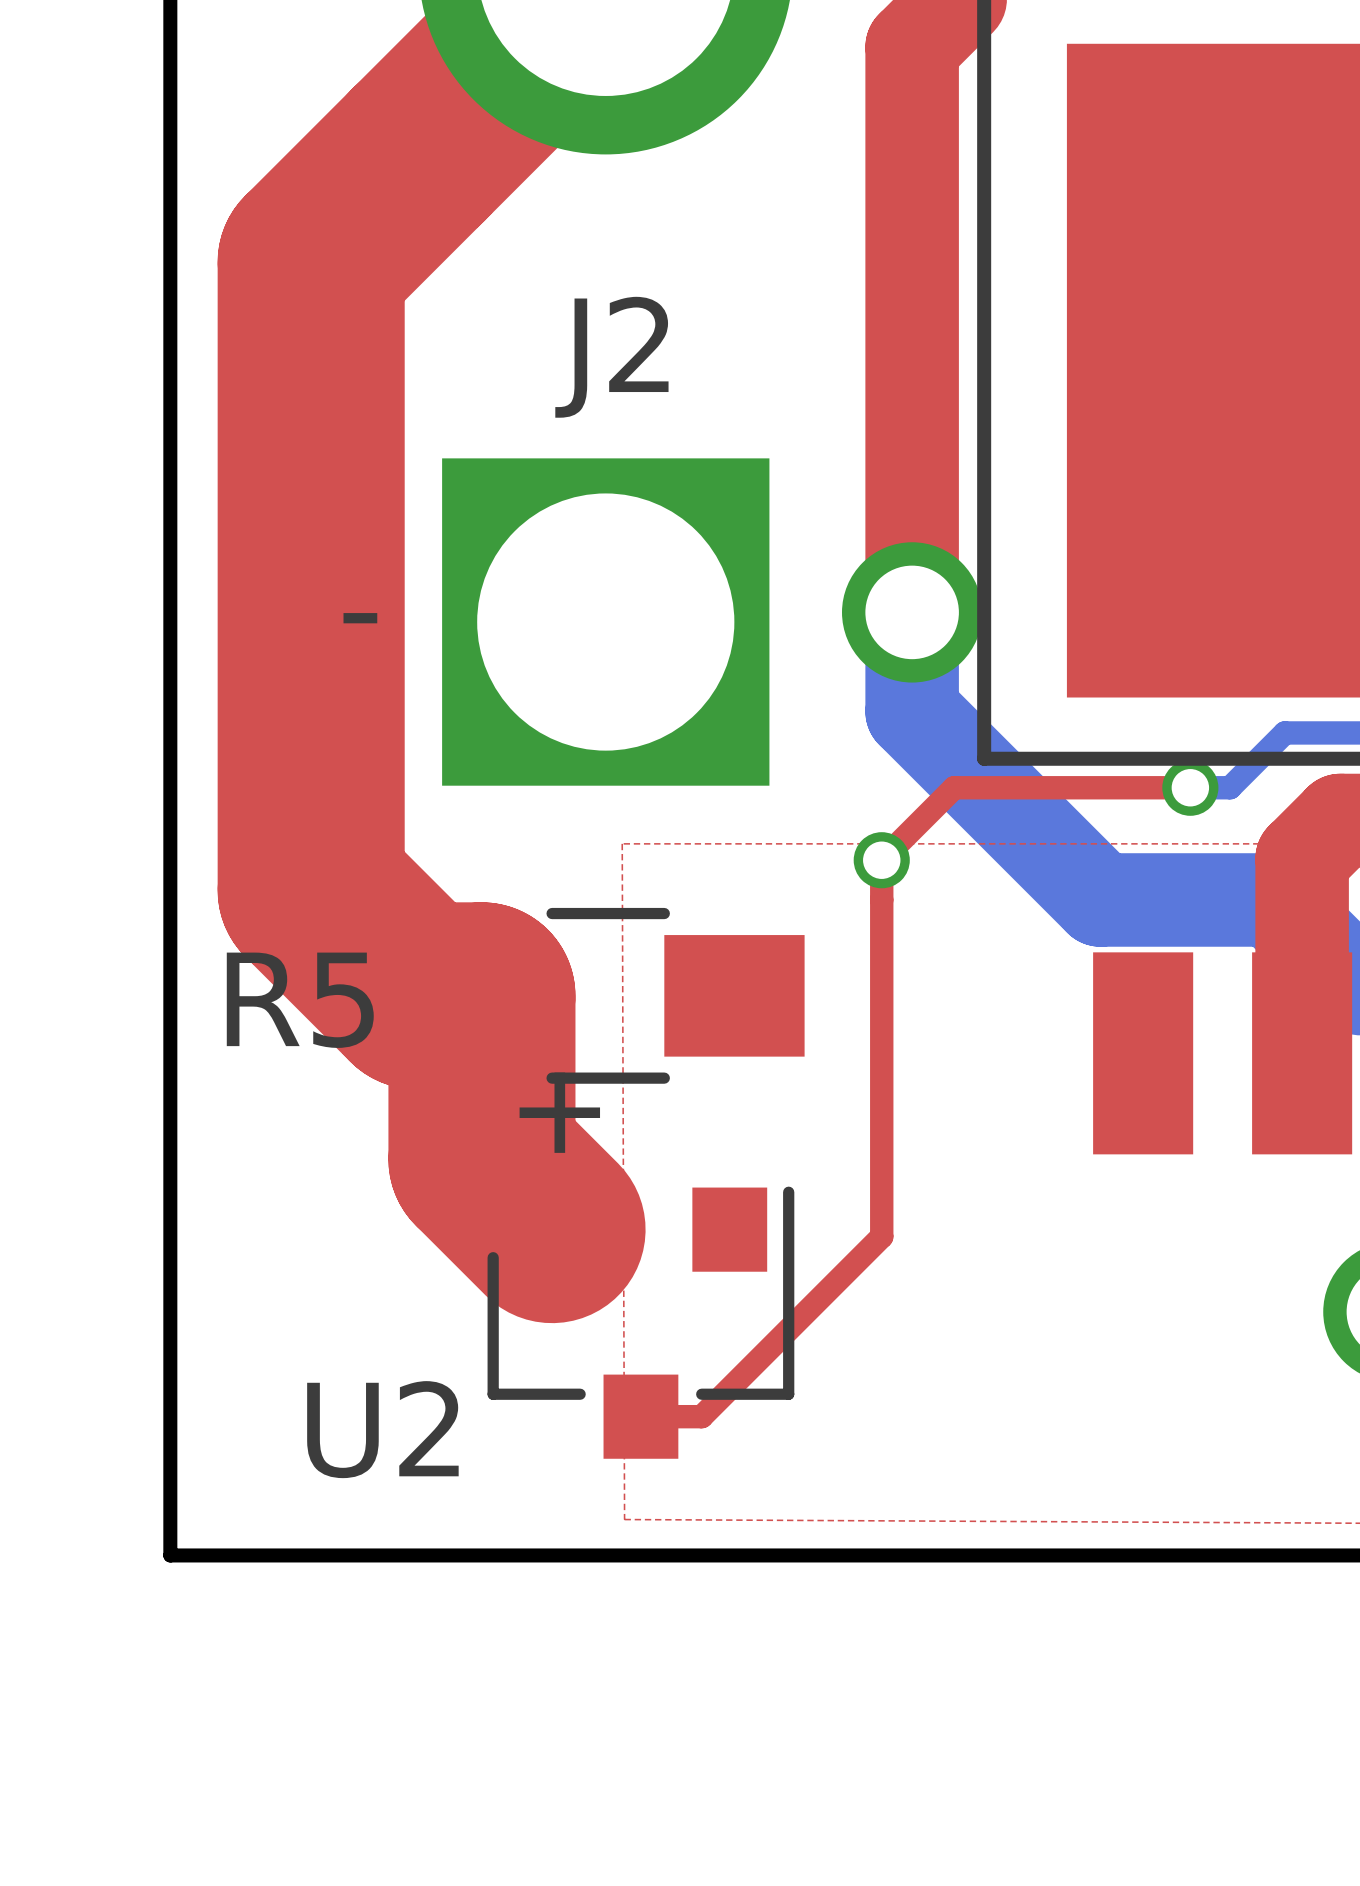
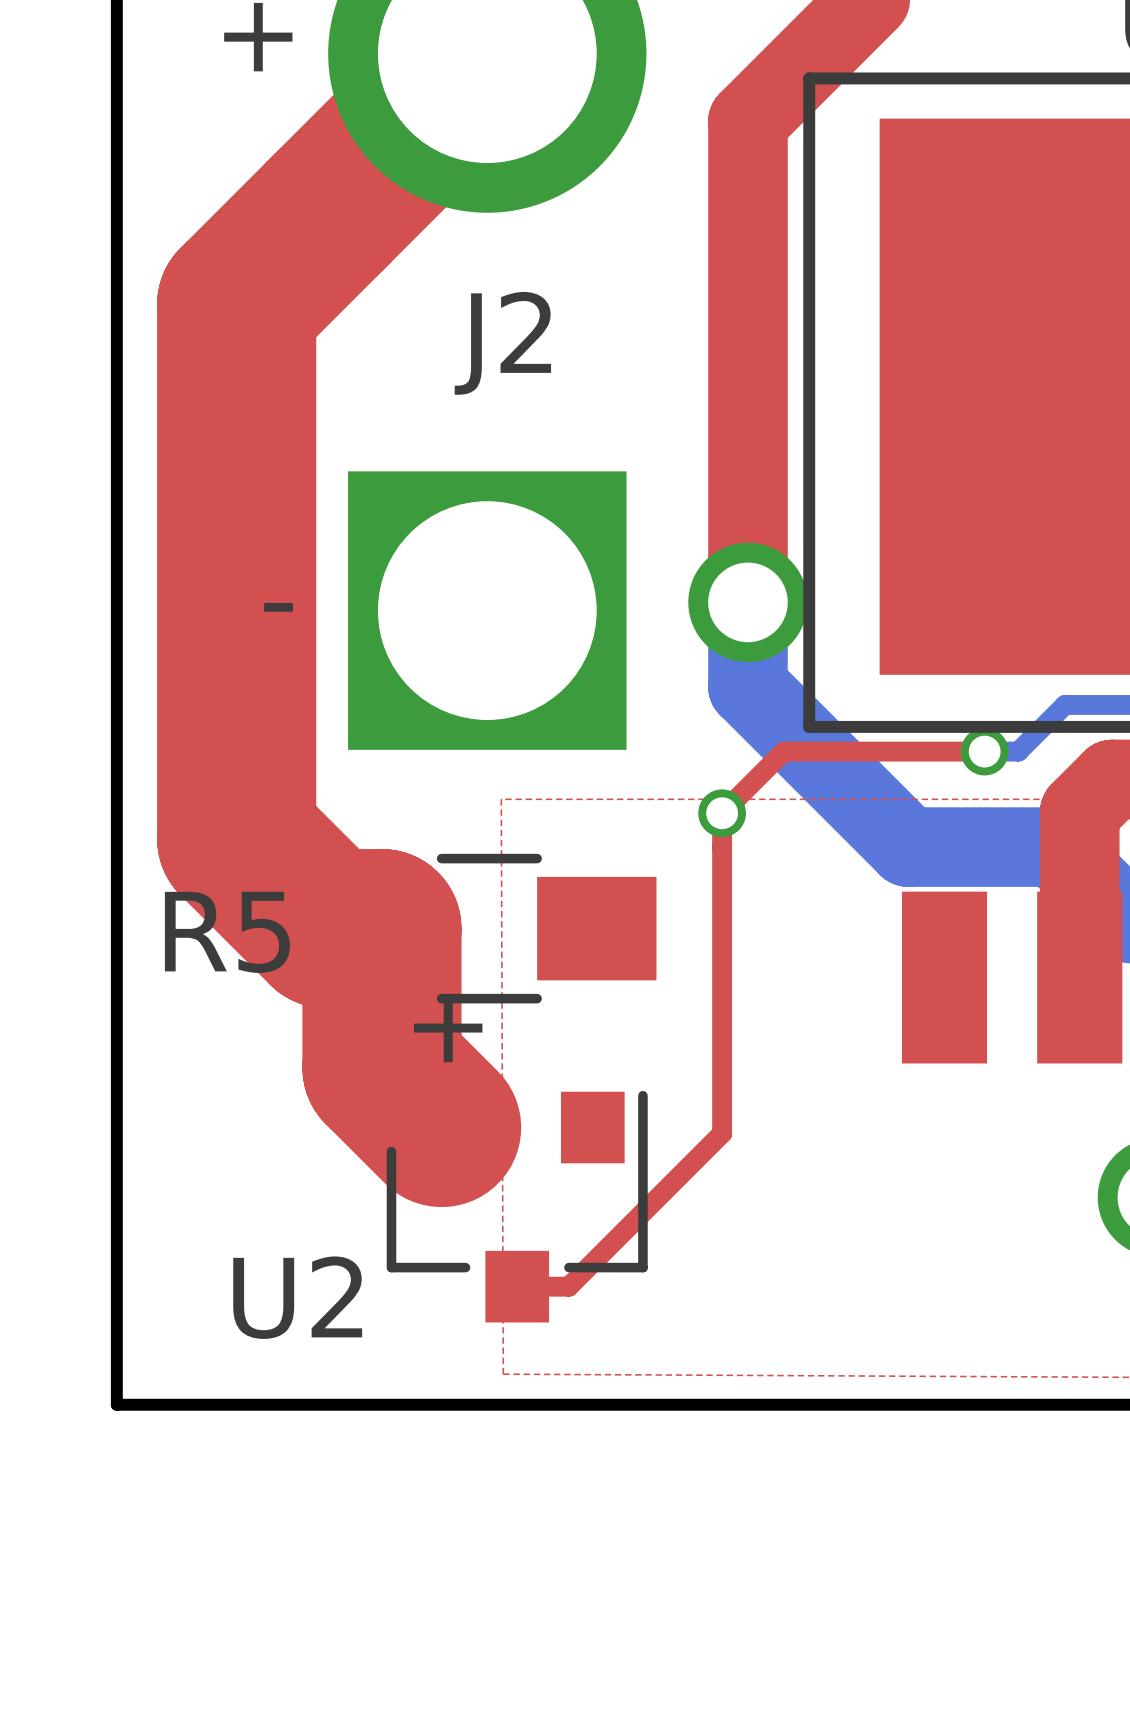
J2 name position: J2 (611, 357) -> J2 (502, 343)

